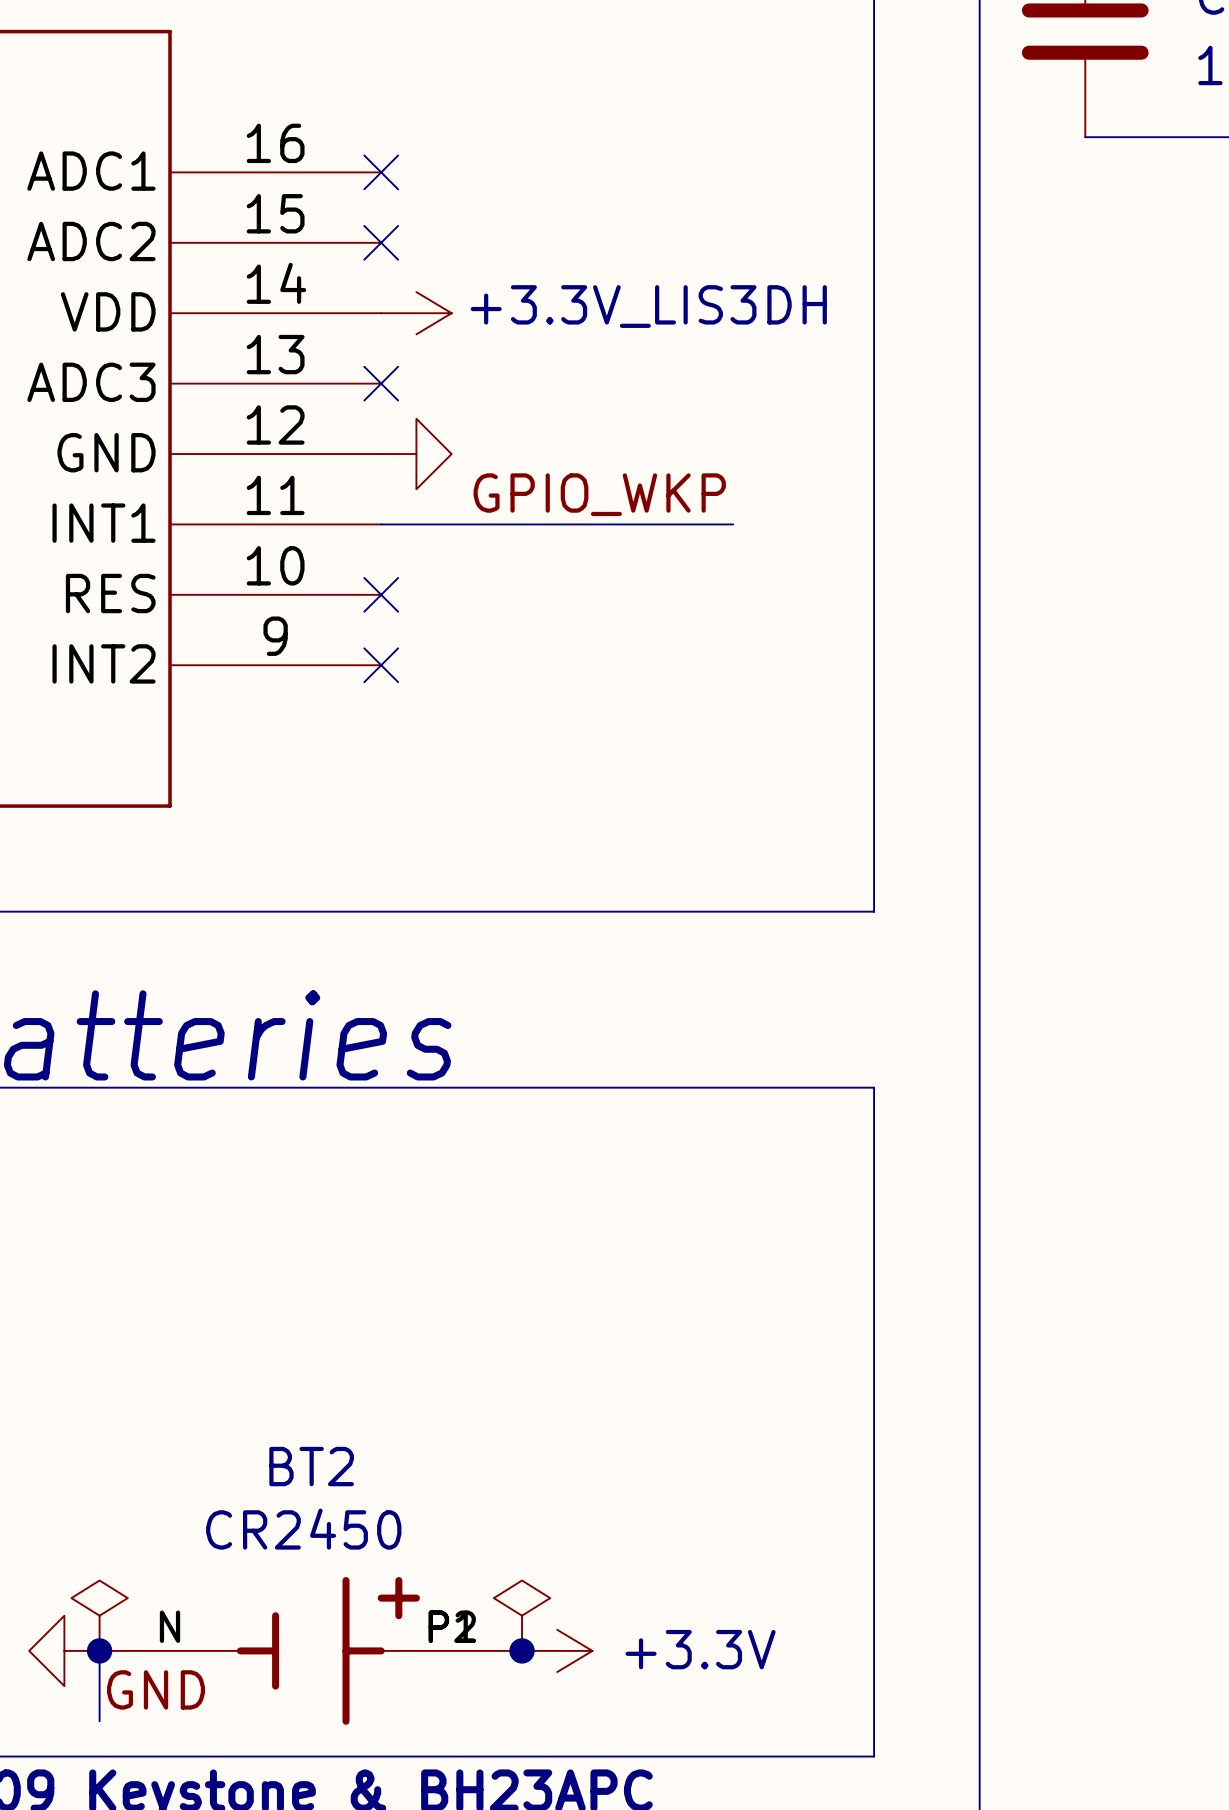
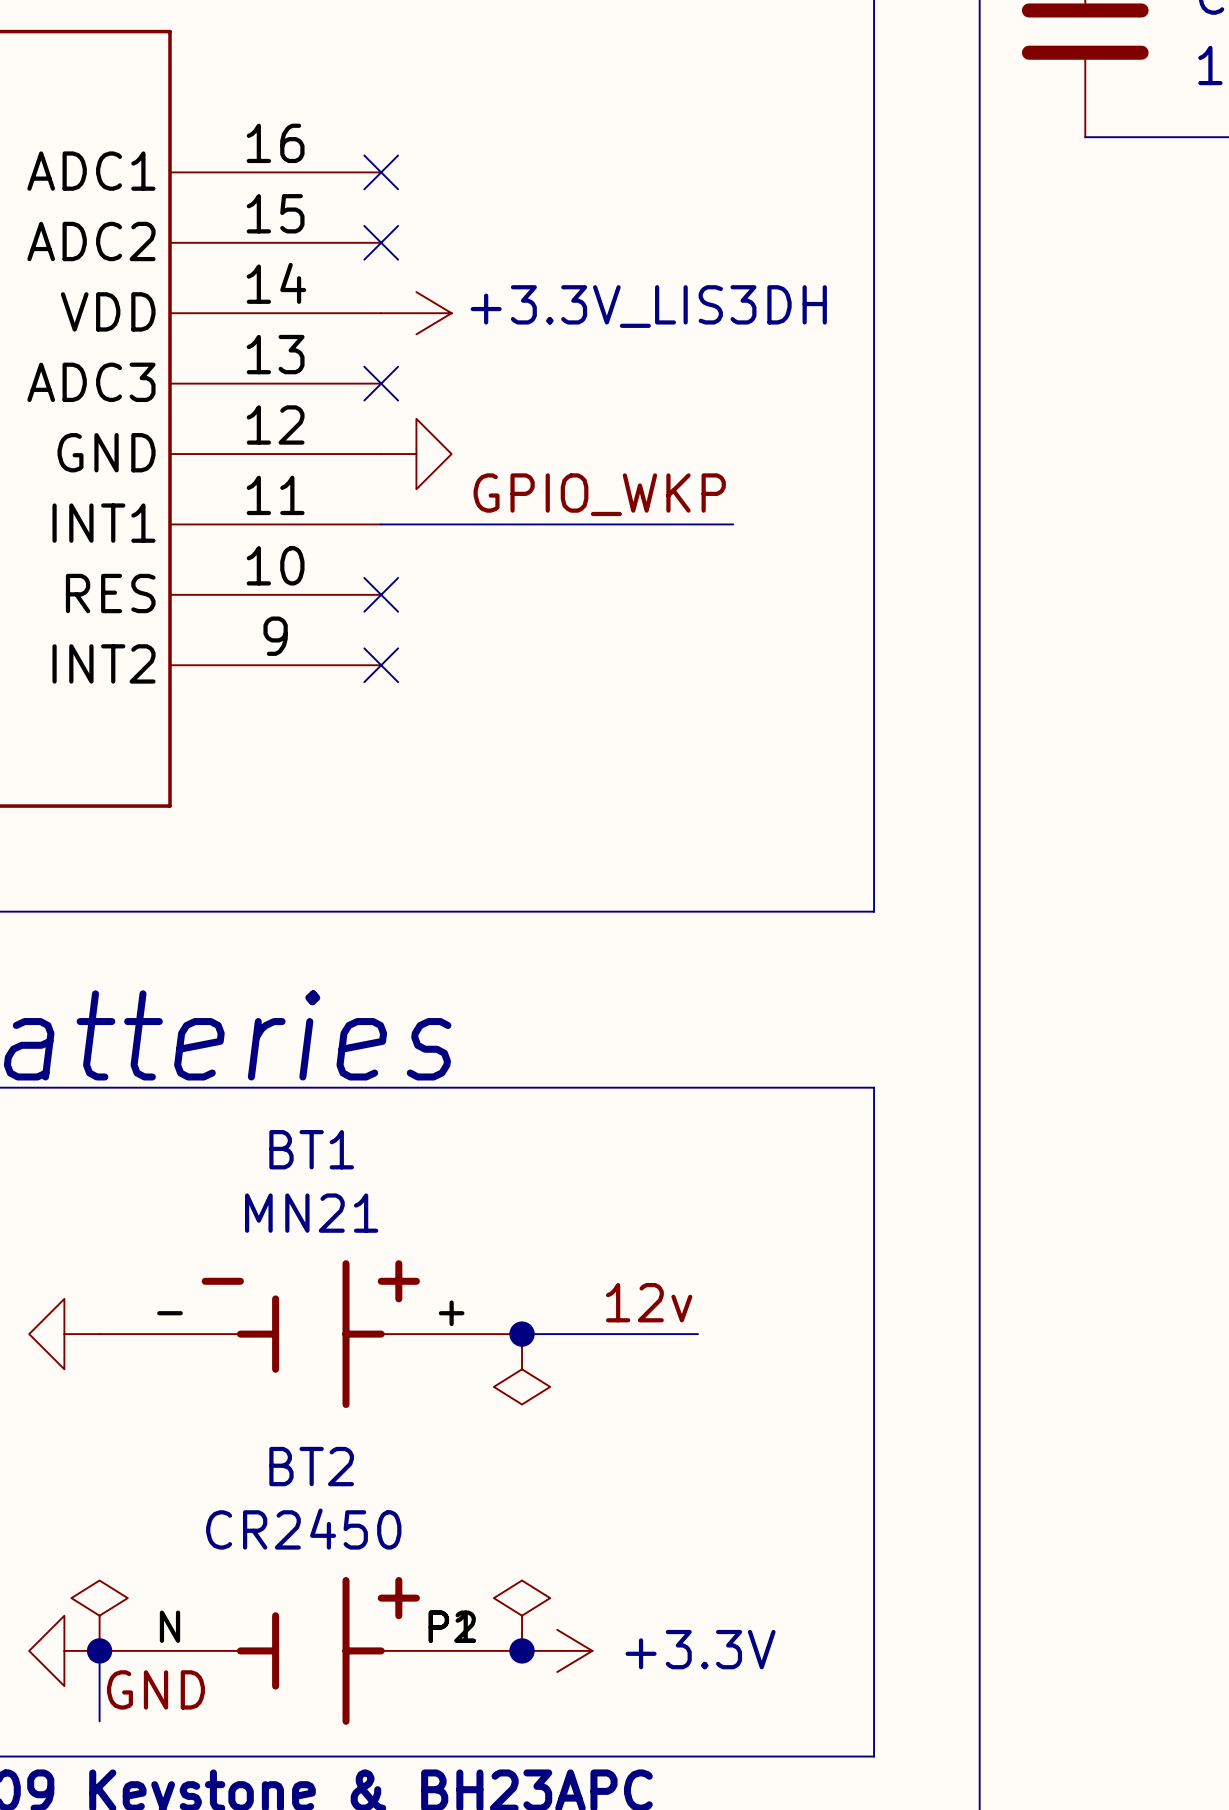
label: none -> 12v (649, 1302)
power symbol: none -> (64, 1334)
BT1: none -> MN21 (310, 1334)
wire: none -> (522, 1334) (698, 1334)
junction: none -> (522, 1334)
power symbol: none -> (522, 1369)

